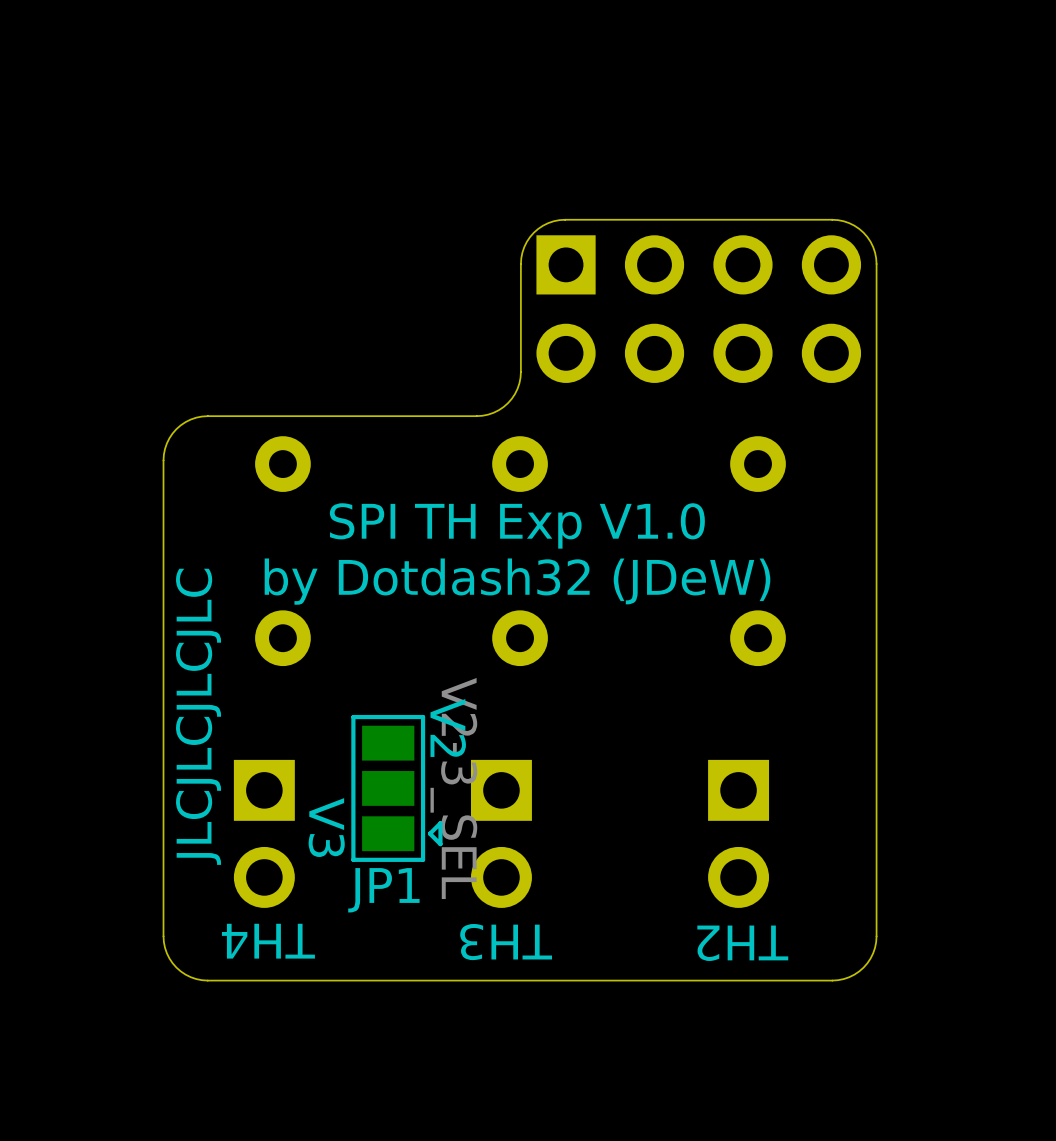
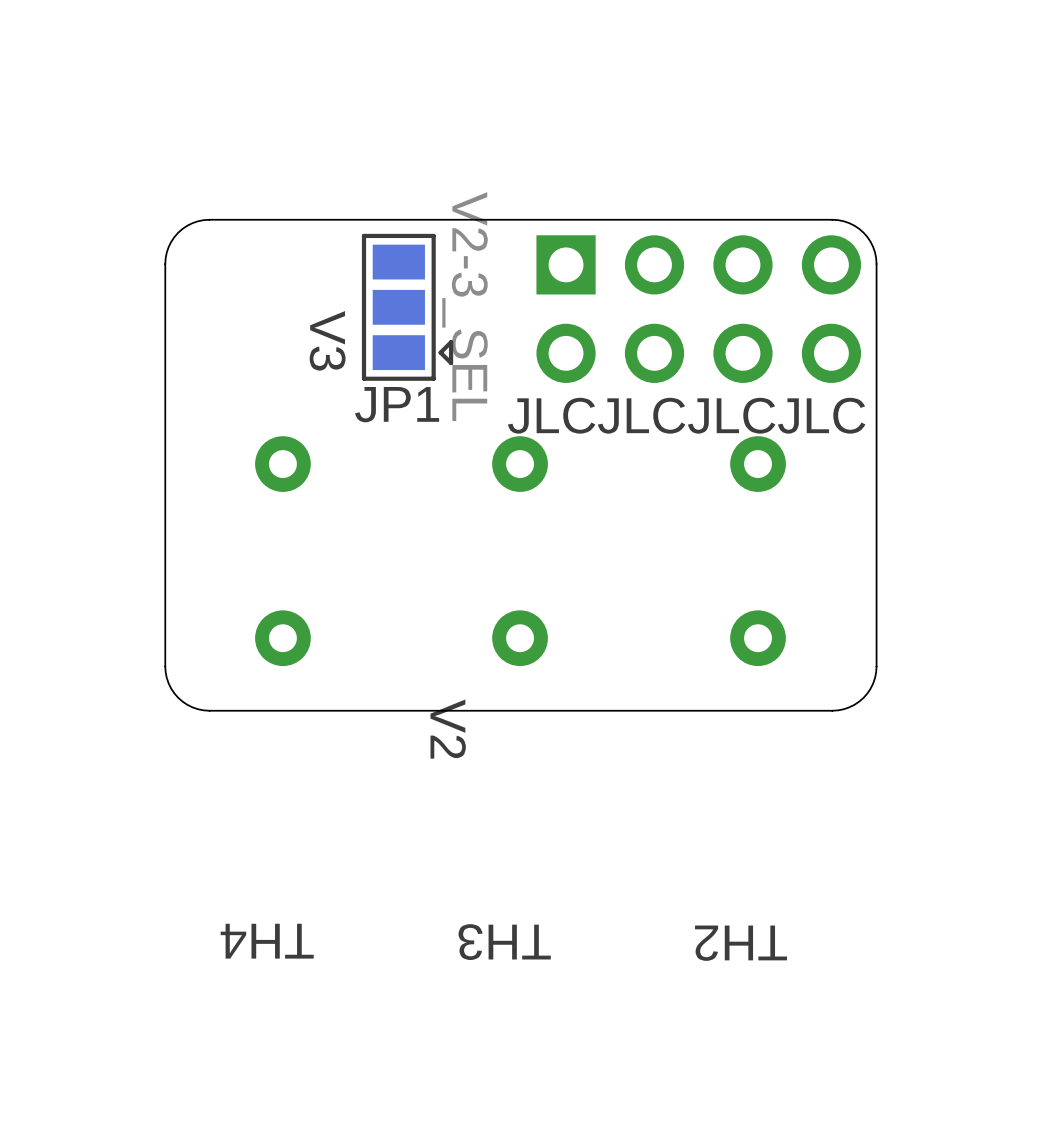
board edge: (565, 219) (553, 221) (543, 225) (533, 232) (524, 247) (520, 263) (520, 377) (517, 388) (511, 398) (498, 410) (488, 414) (476, 416) (201, 416) (185, 422) (176, 429) (169, 438) (165, 448) (163, 460) (163, 936) (165, 947) (172, 963) (185, 974) (196, 979) (207, 980) (832, 980) (849, 977) (859, 971) (867, 963) (873, 953) (876, 942) (876, 666) -> (565, 219) (209, 219) (198, 221) (187, 225) (174, 237) (166, 252) (165, 263) (165, 666) (166, 677) (174, 693) (187, 704) (198, 709) (209, 710) (832, 710) (849, 707) (863, 697) (873, 683) (876, 666)
text: SPI TH Exp V1.0 (517, 525) -> none
text: by Dotdash32 (JDeW) (517, 581) -> none
text rotation: 0° (198, 716) -> 90° clockwise (686, 415)
text position: JLCJLCJLCJLC (198, 716) -> JLCJLCJLCJLC (686, 415)
JP1 position: (396, 788) -> (407, 307)
text position: V3 (326, 827) -> V3 (327, 340)
part: (264, 833) -> none
part: (501, 833) -> none
part: (738, 833) -> none

